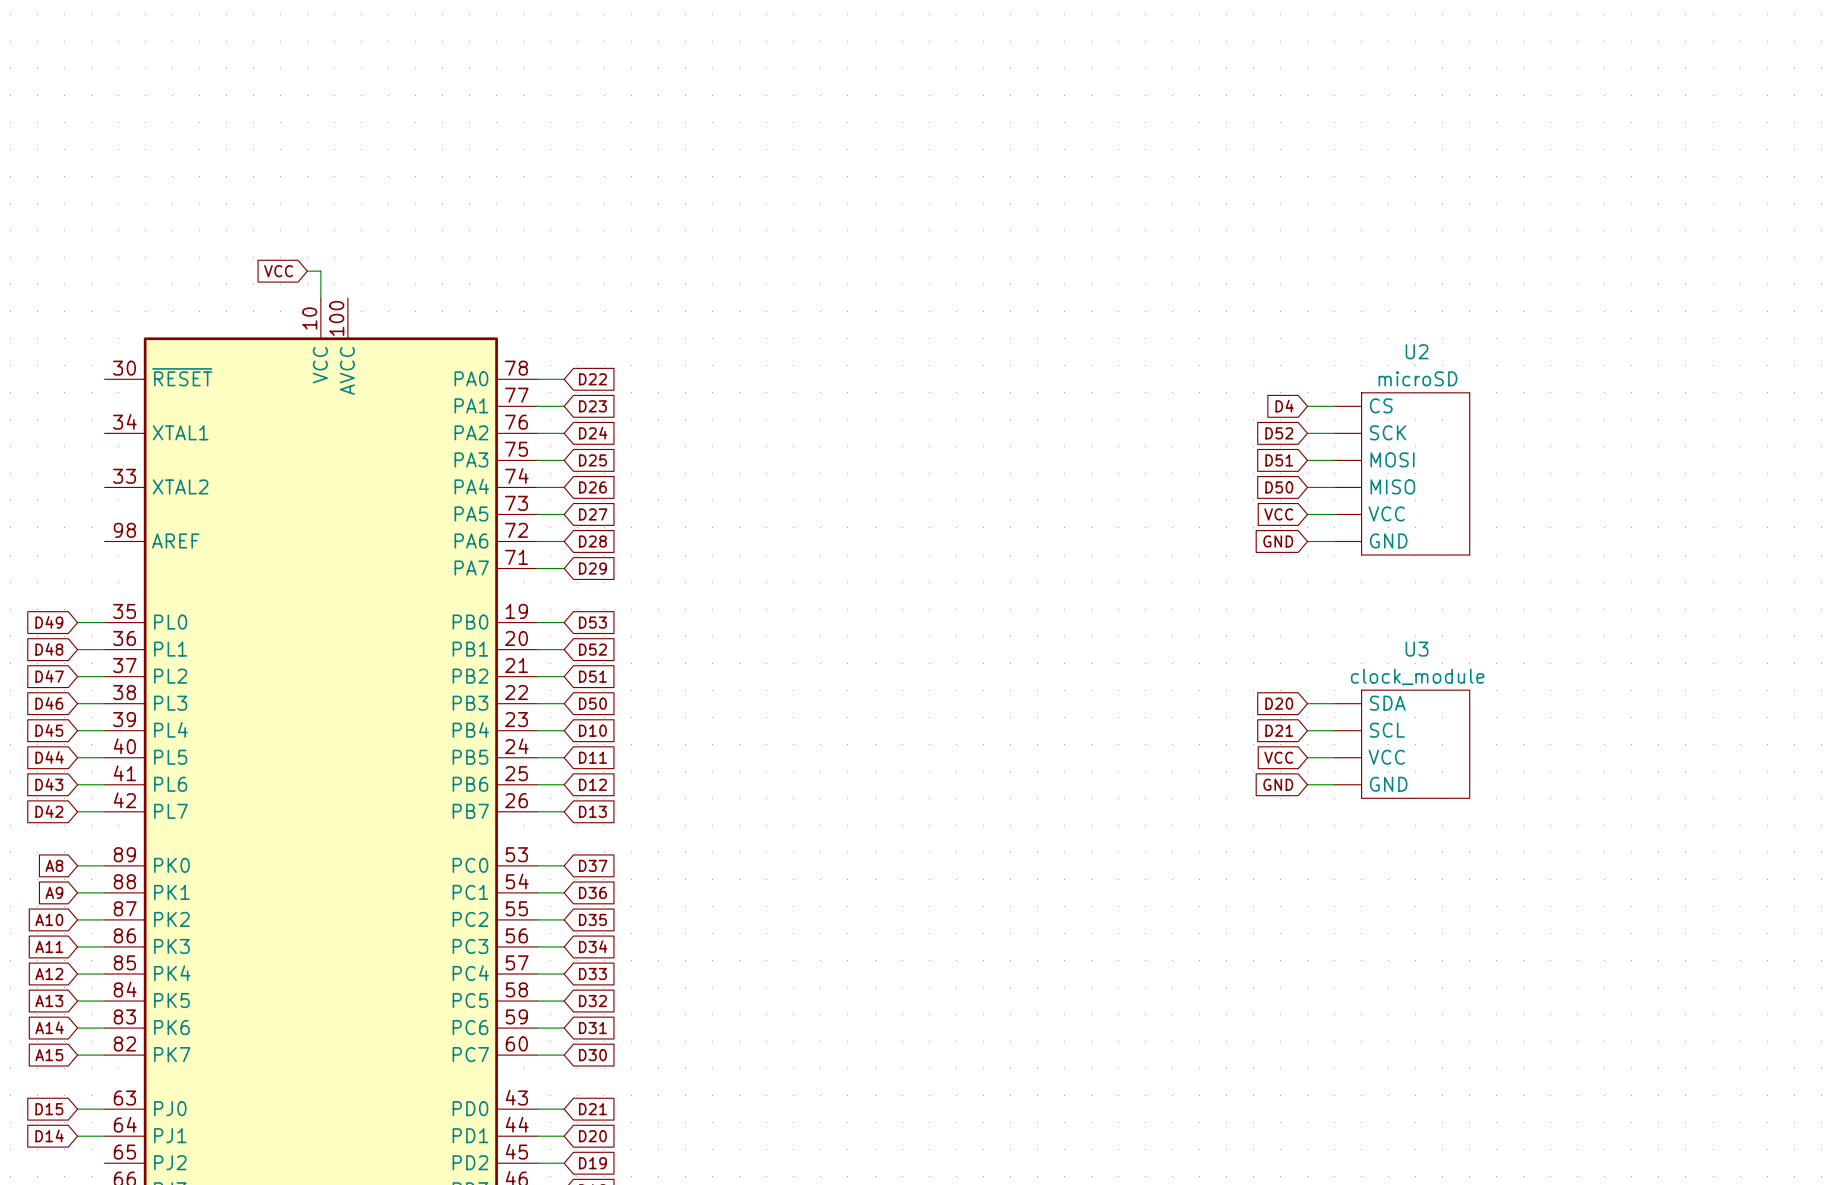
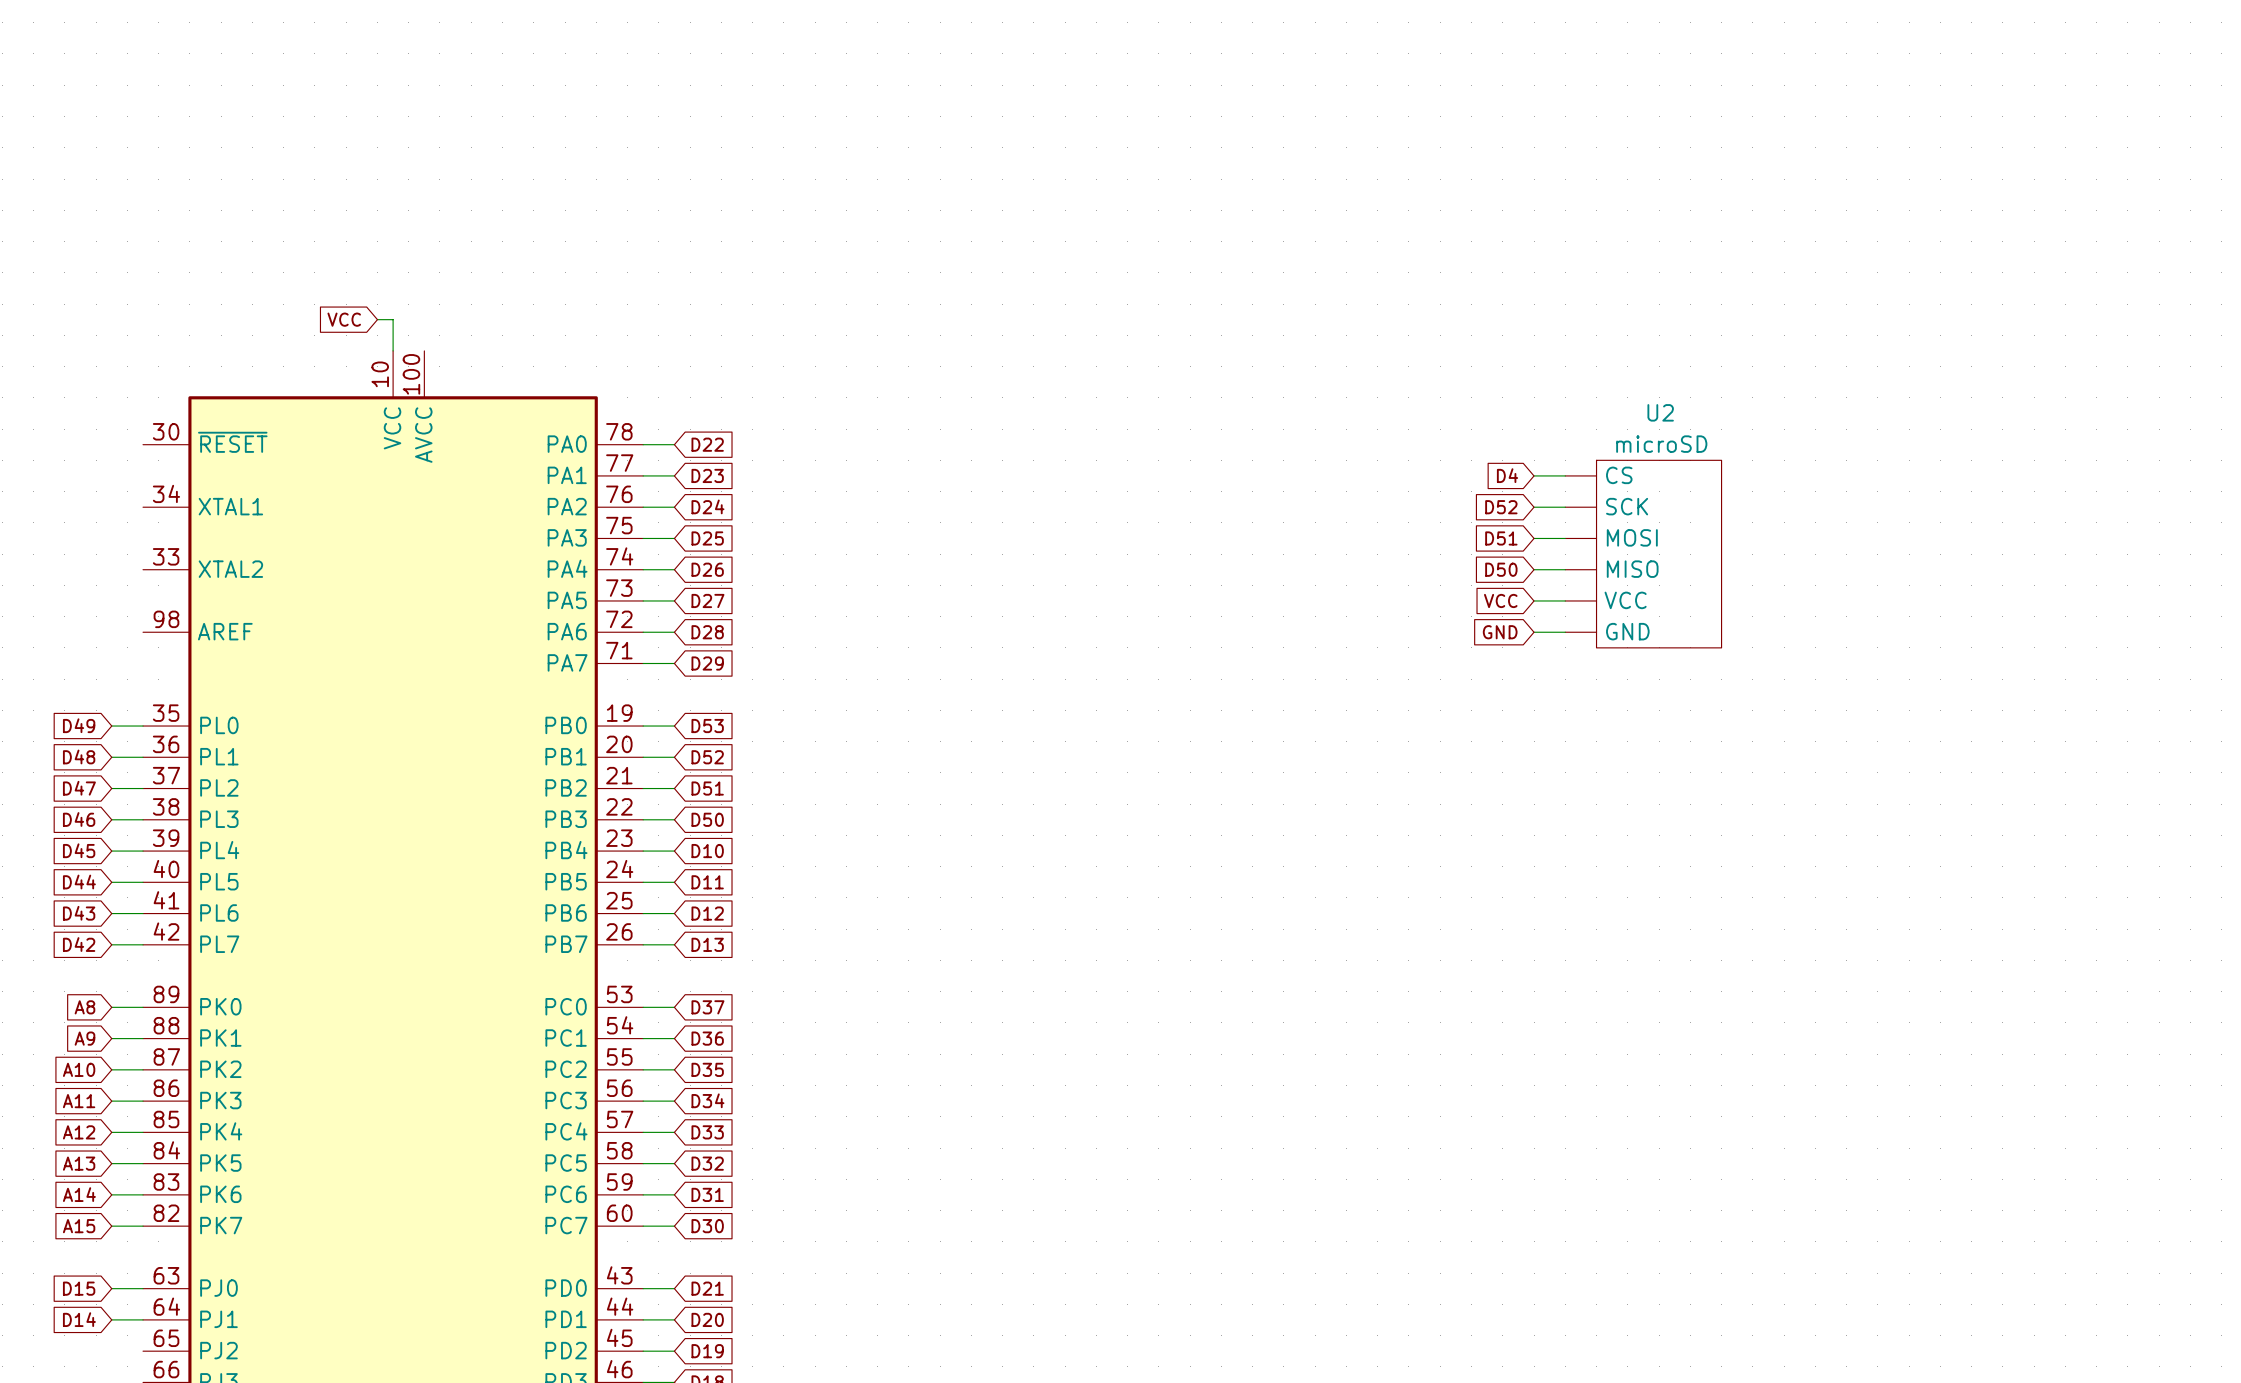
global label: D20 (1279, 703) -> none
wire: (1307, 703) (1334, 703) -> none
global label: D21 (1279, 730) -> none
wire: (1307, 730) (1334, 730) -> none
U3: clock_module (1402, 744) -> none
global label: VCC (1278, 757) -> none
wire: (1307, 757) (1334, 757) -> none
global label: GND (1278, 784) -> none
wire: (1307, 784) (1334, 784) -> none

